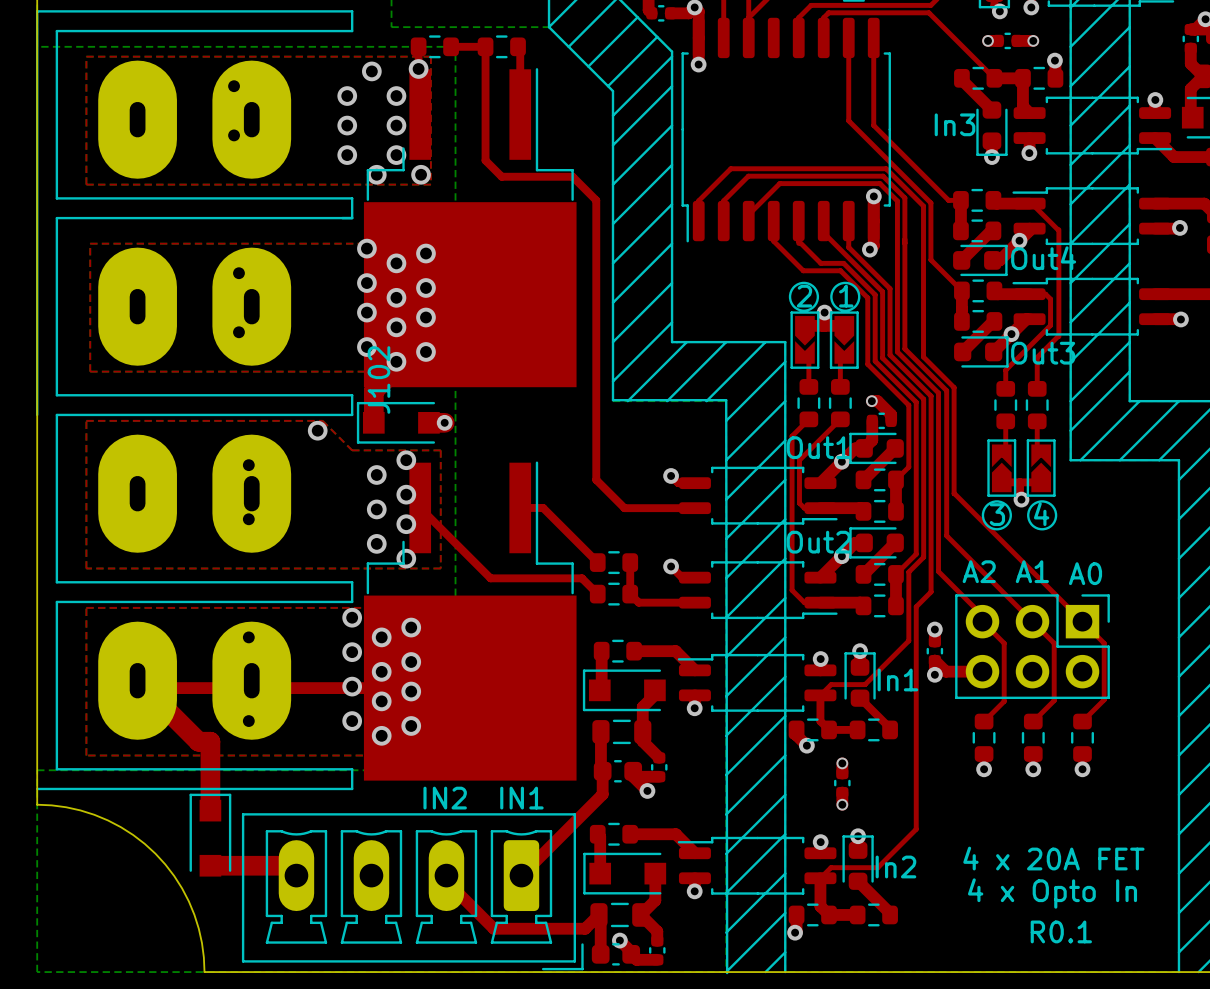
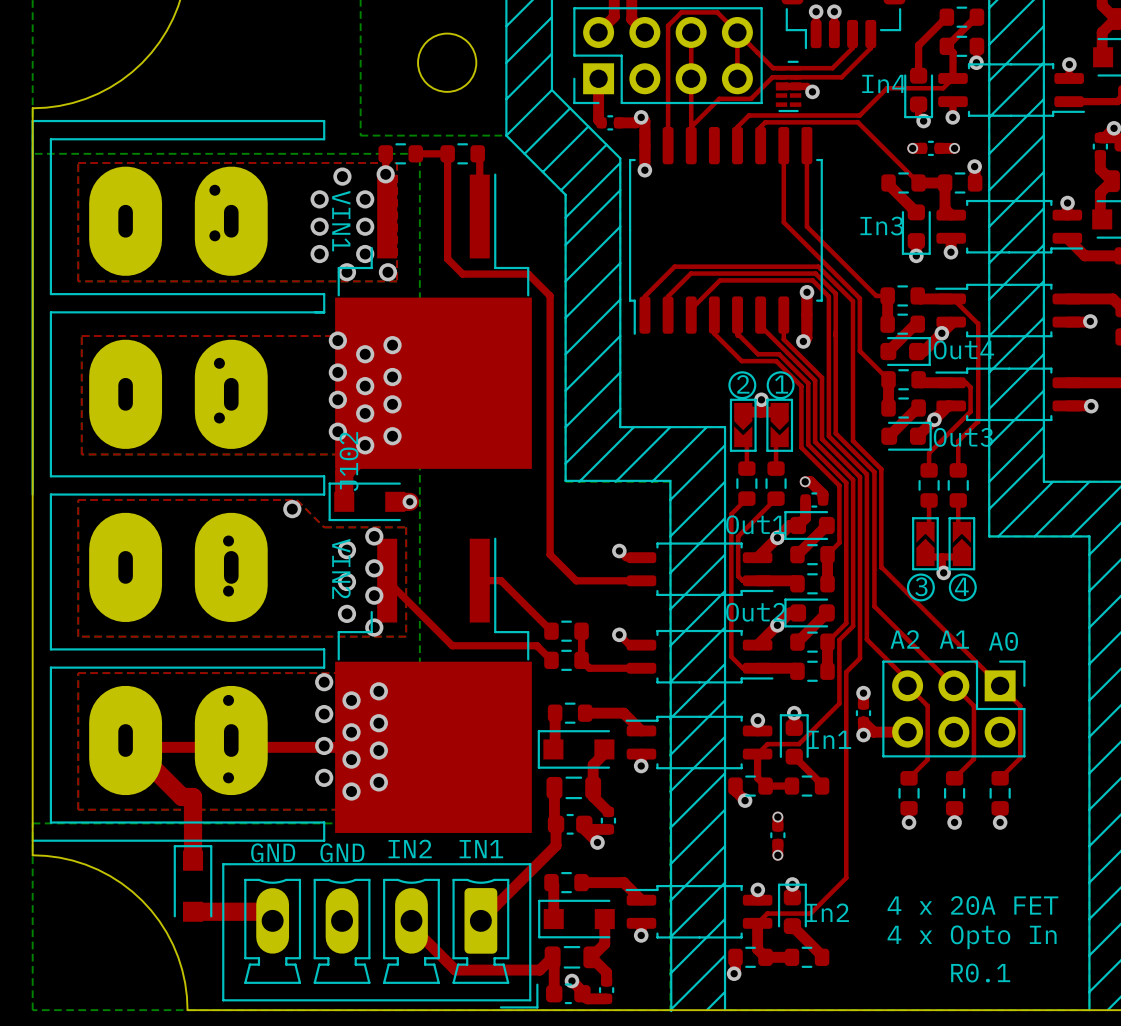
text: none -> VIN1 (341, 221)
text: none -> VIN2 (341, 568)
text: none -> GND (273, 852)
text: none -> GND (342, 852)

